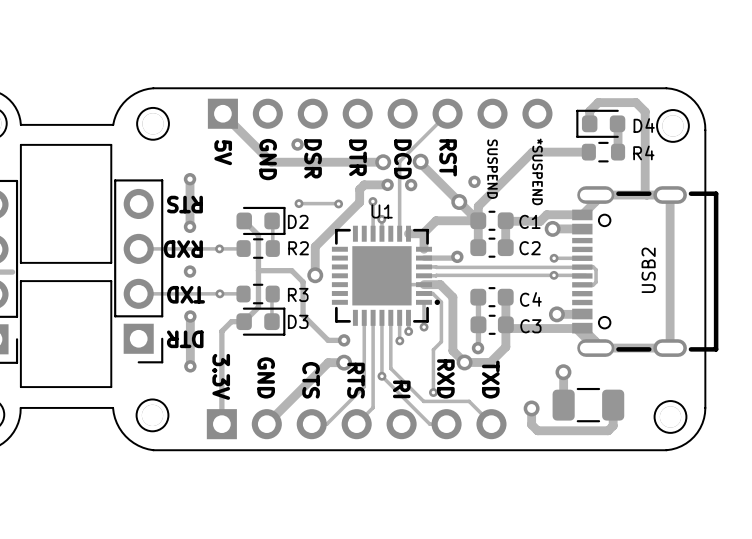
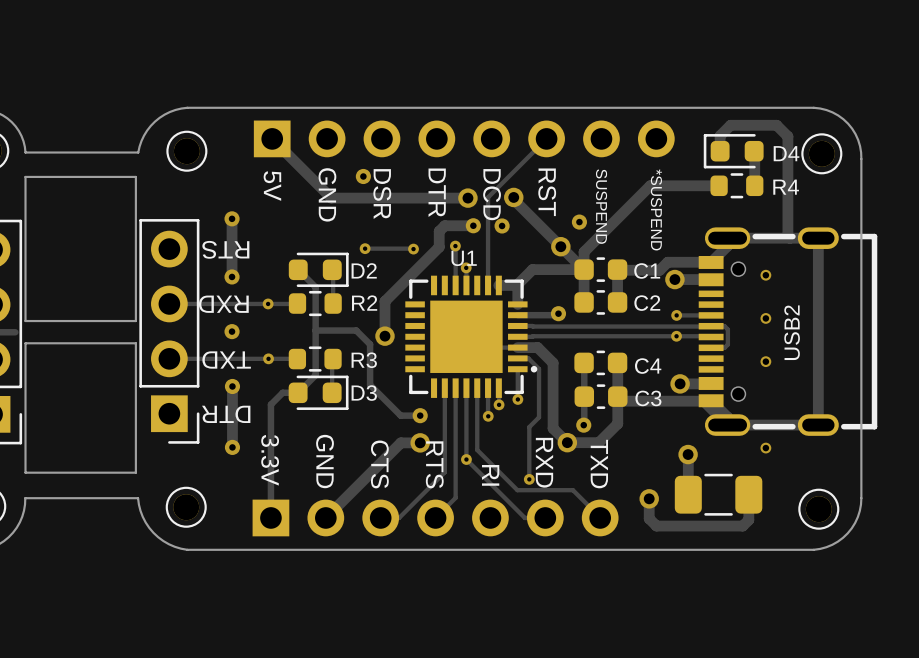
via: none -> (765, 275)
via: none -> (765, 318)
via: none -> (765, 361)
via: none -> (765, 448)

